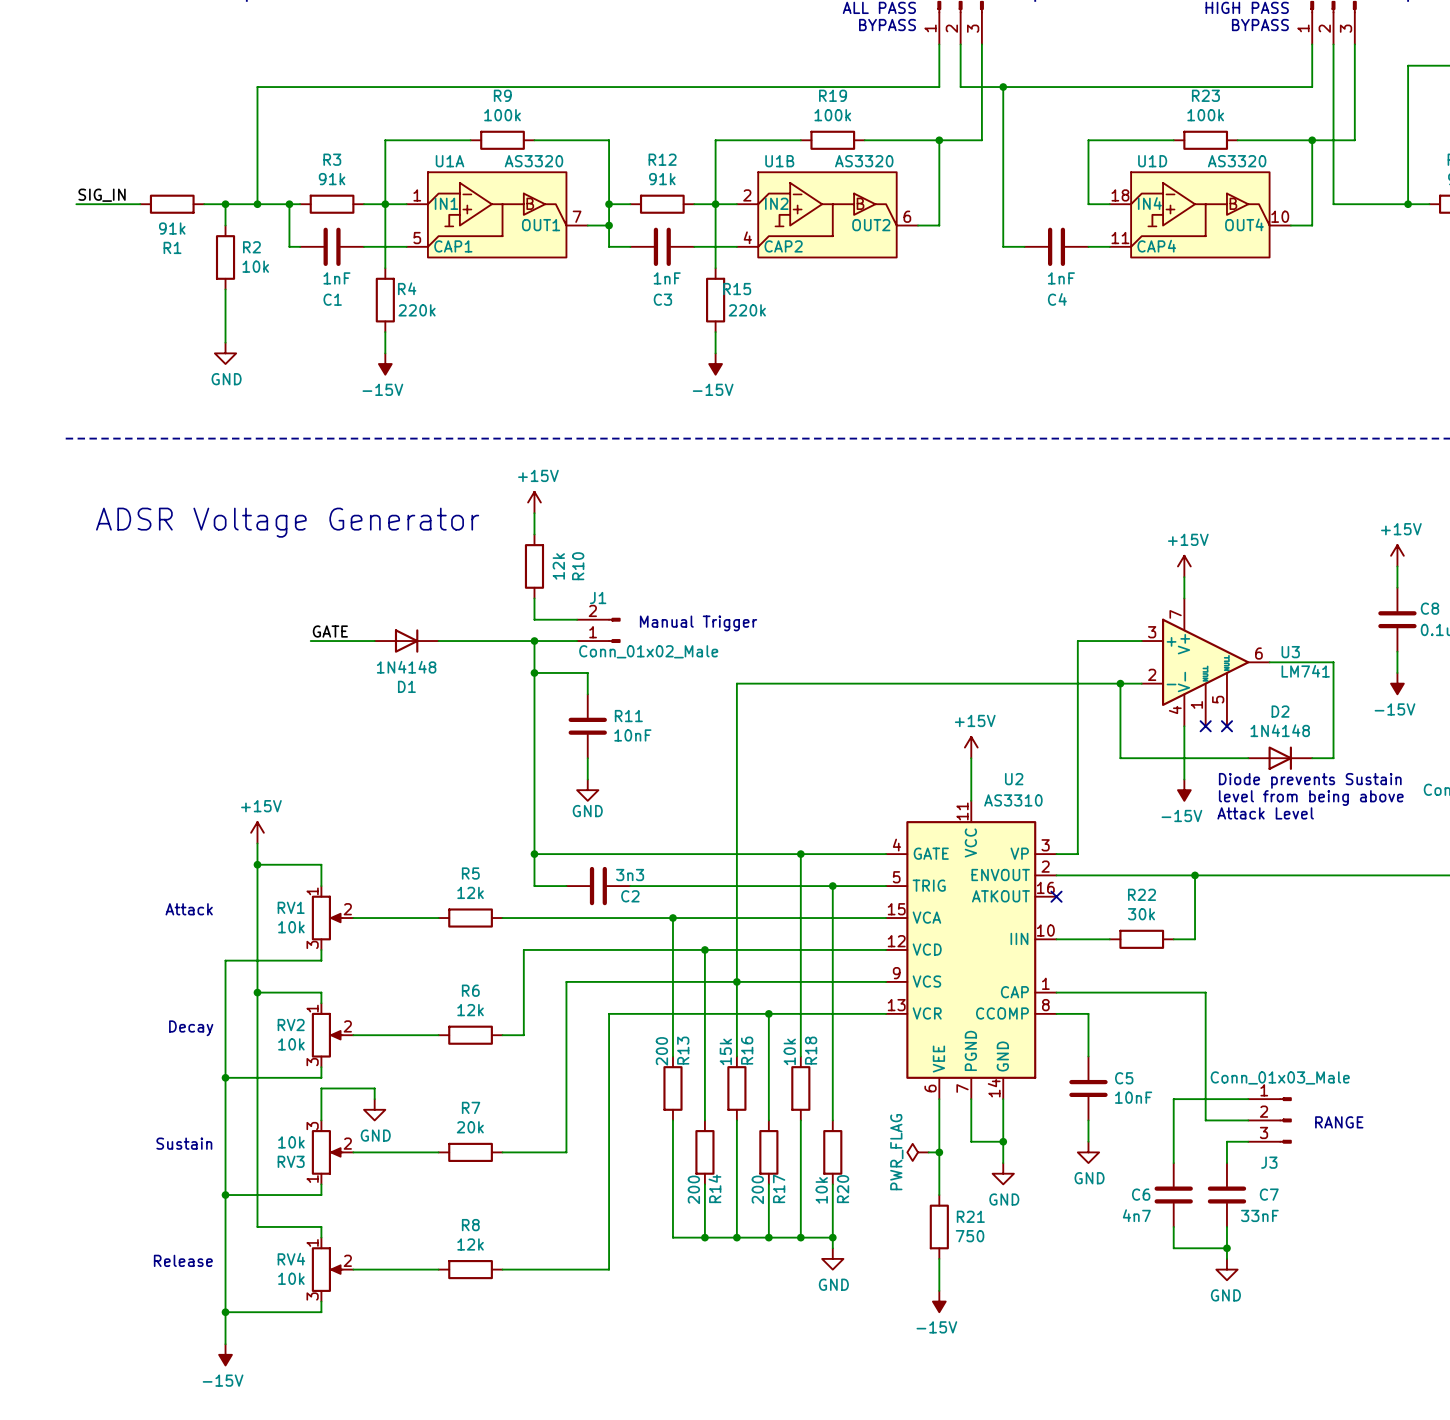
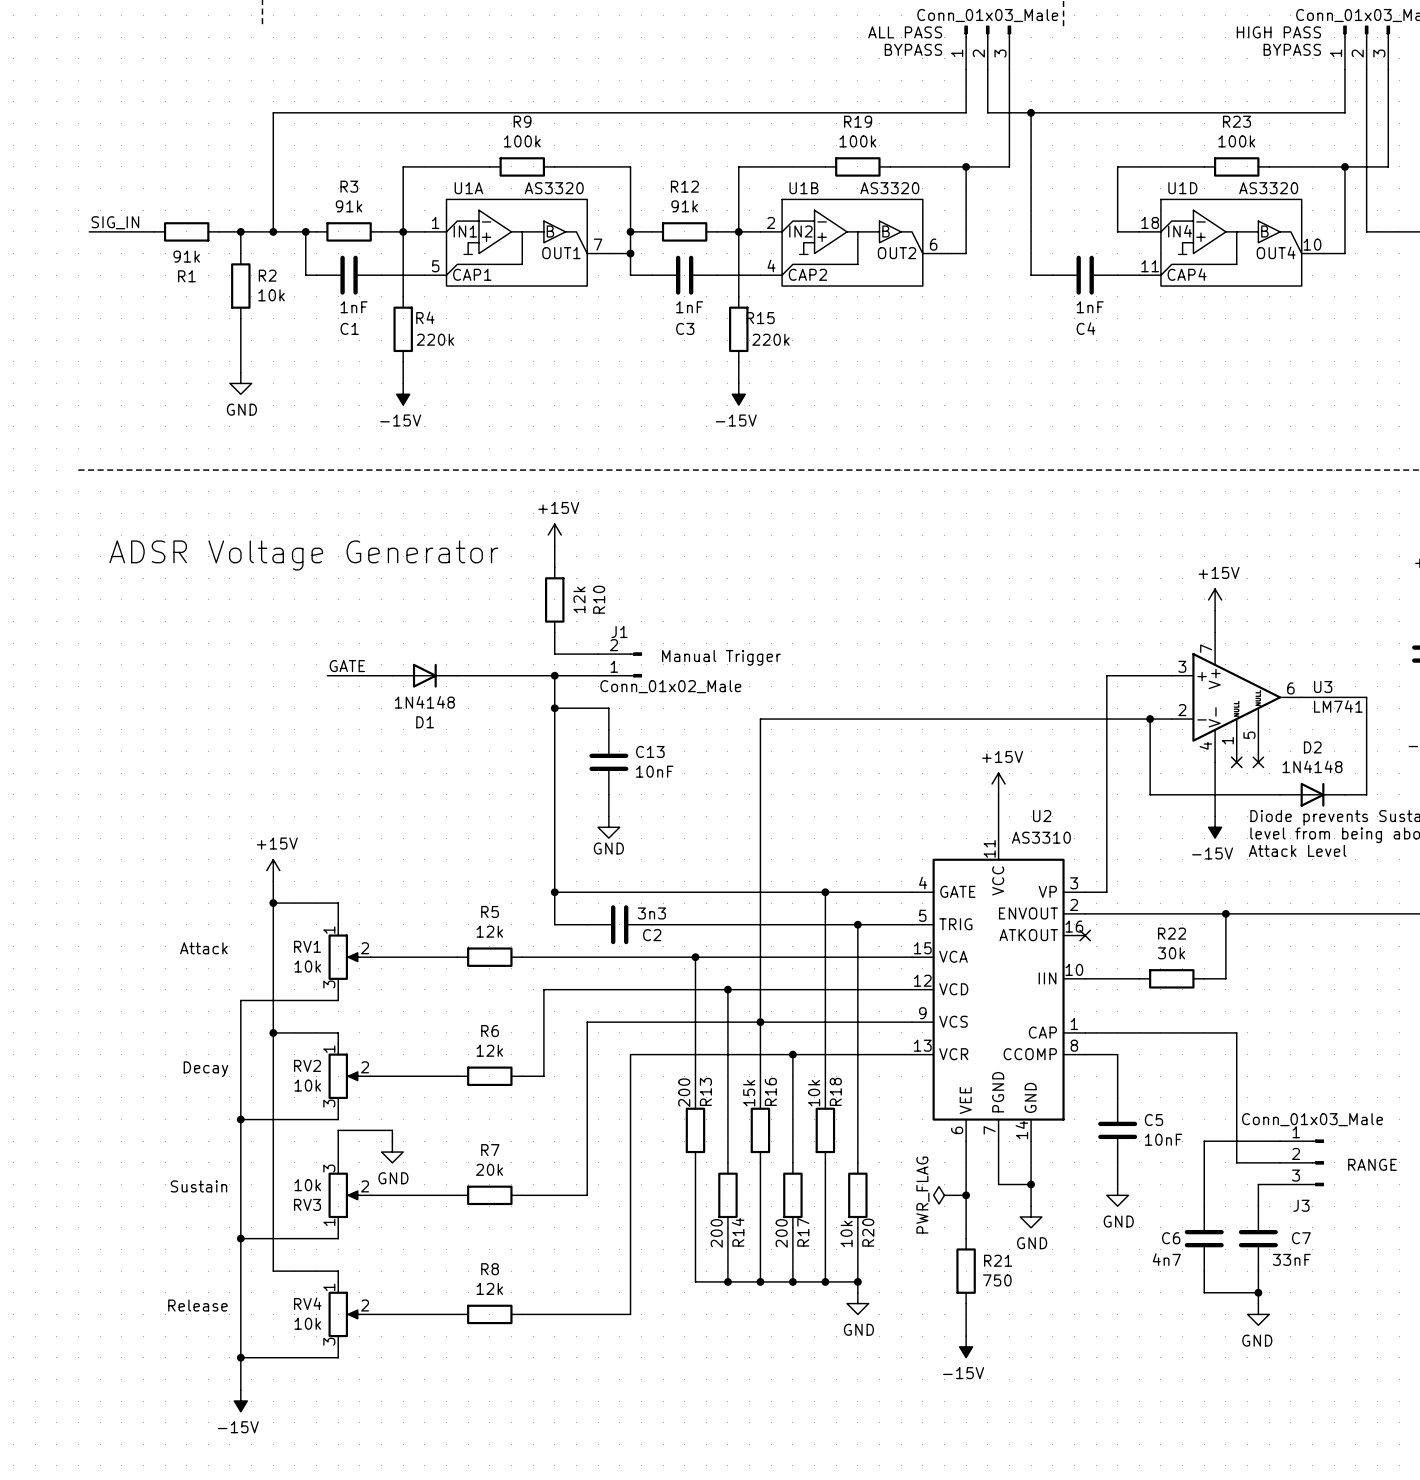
R11 name: R11 (628, 716) -> C13 (650, 751)

